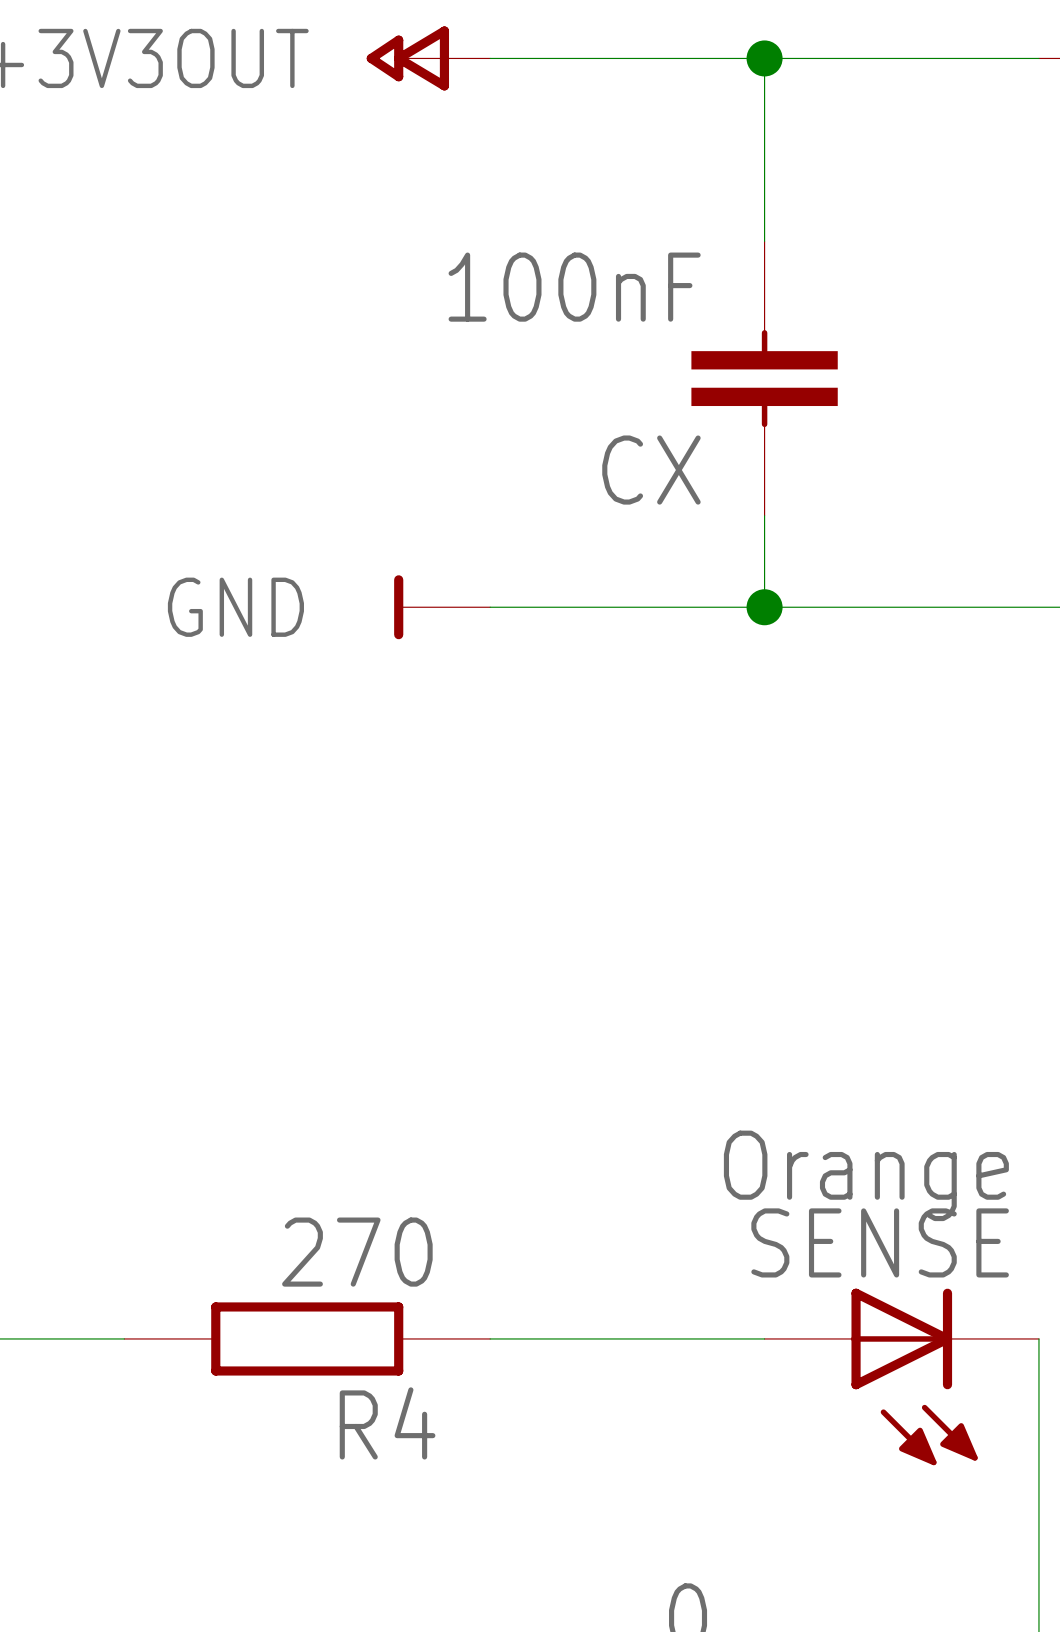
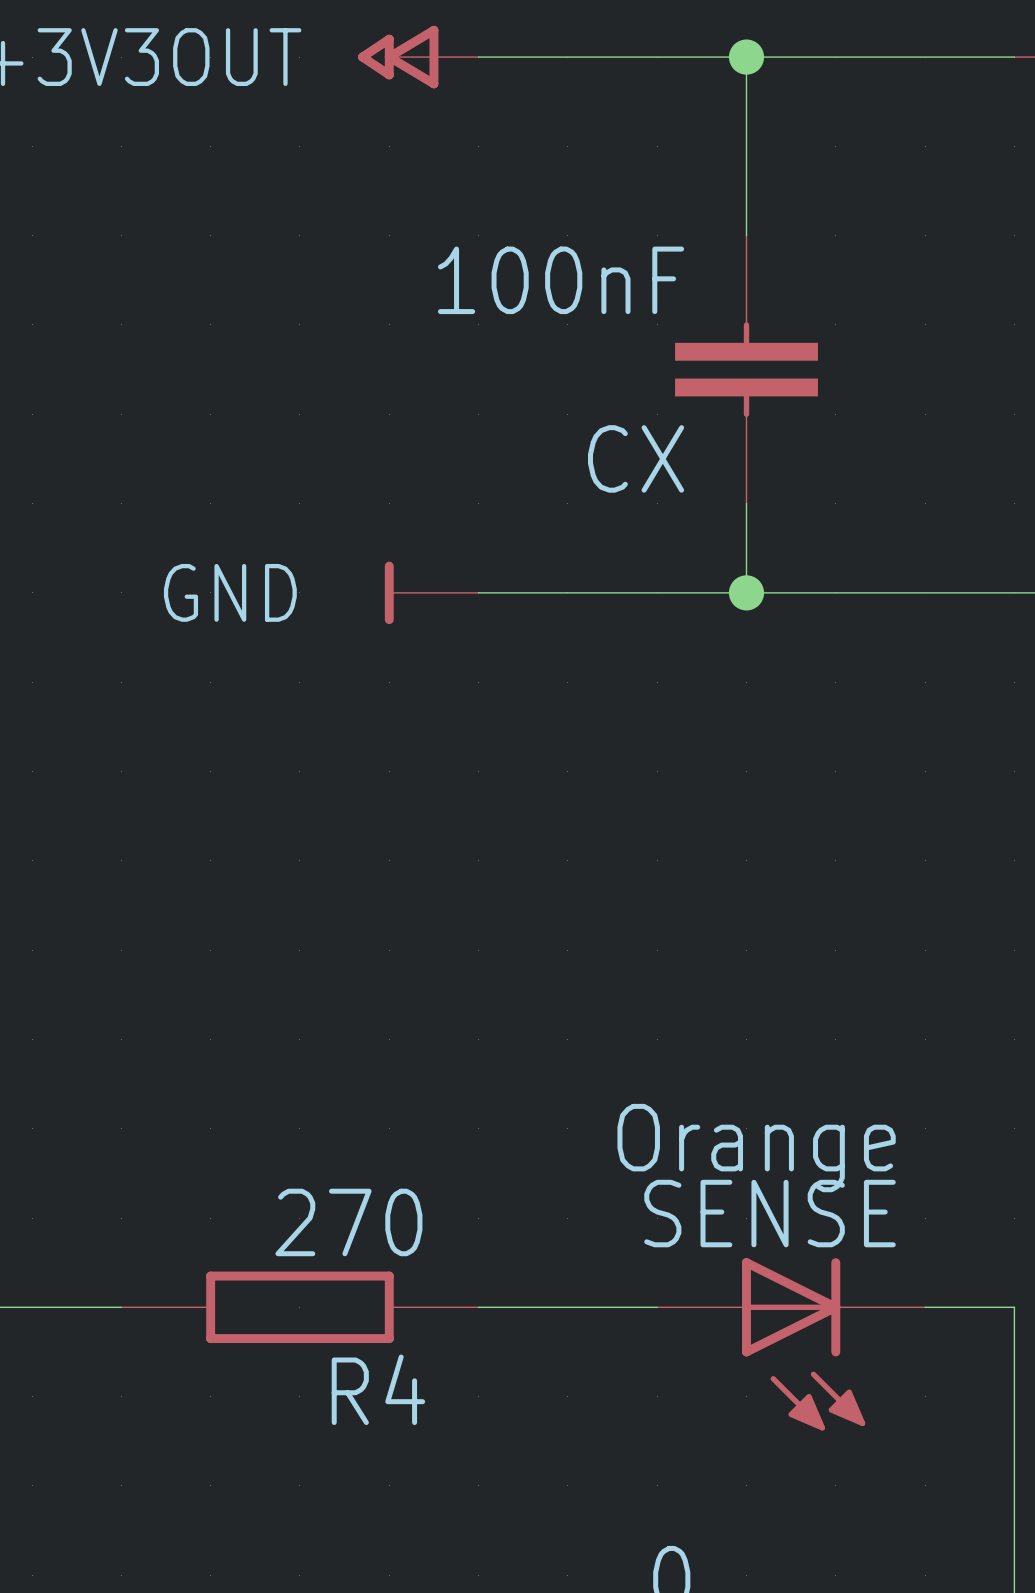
SENSE position: (901, 1376) -> (791, 1344)

